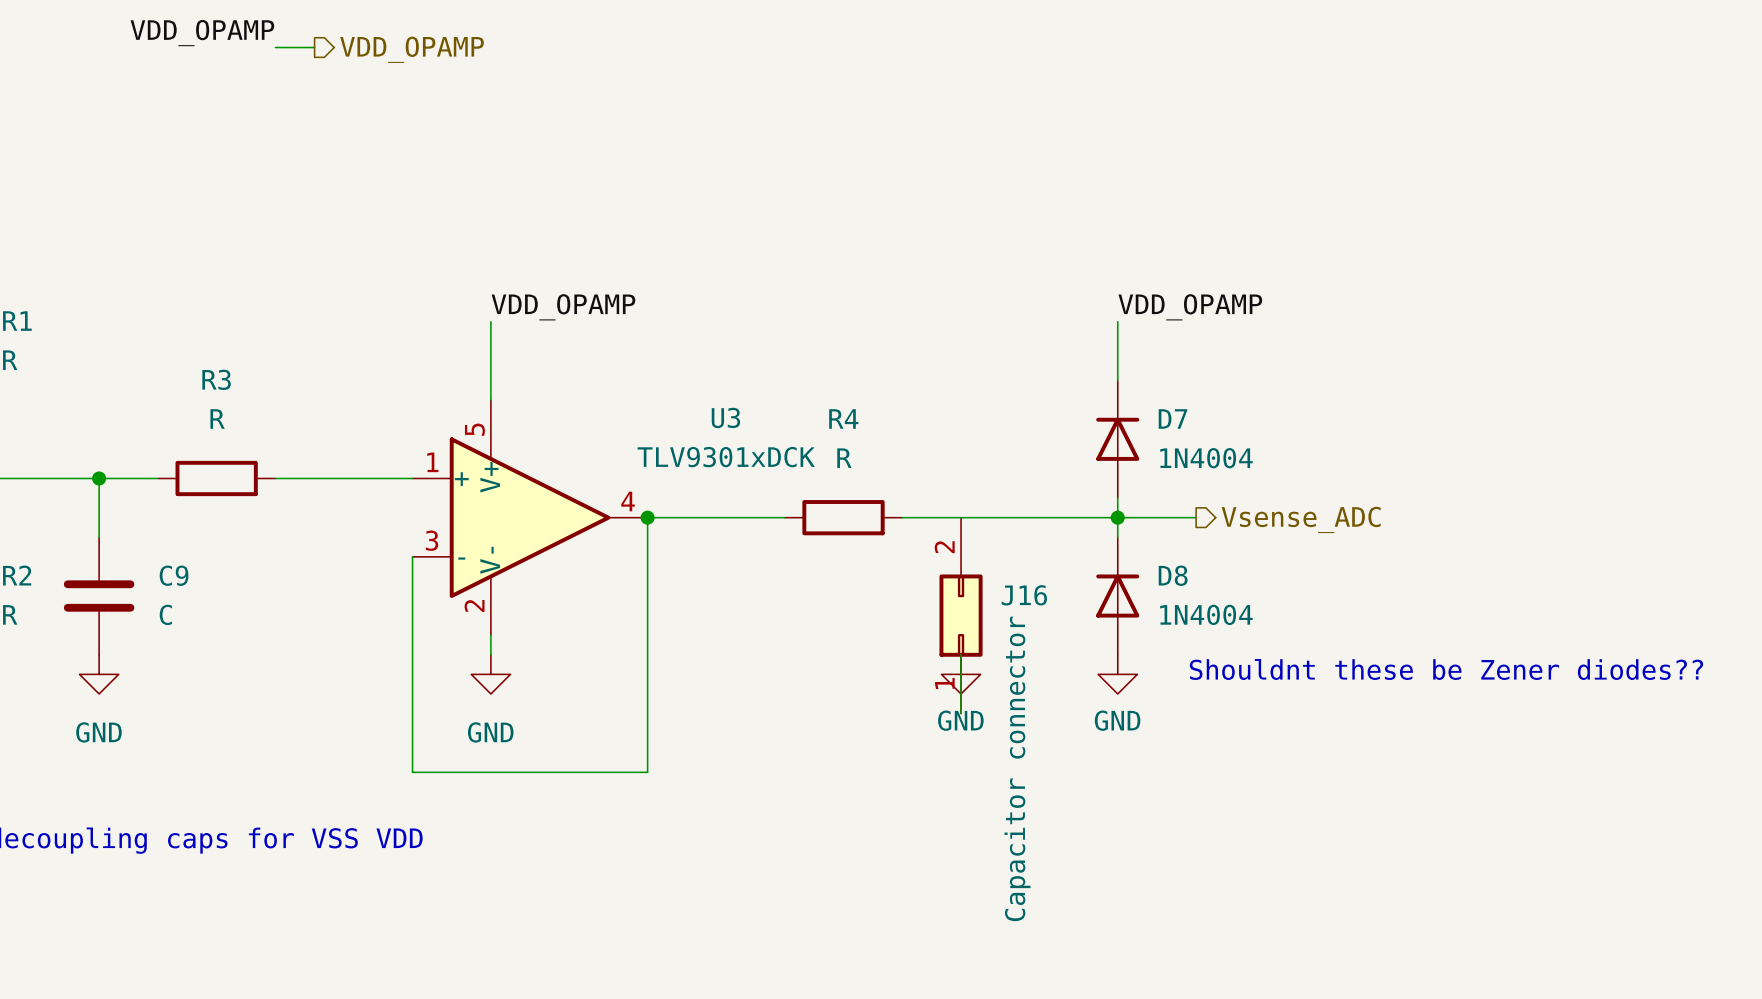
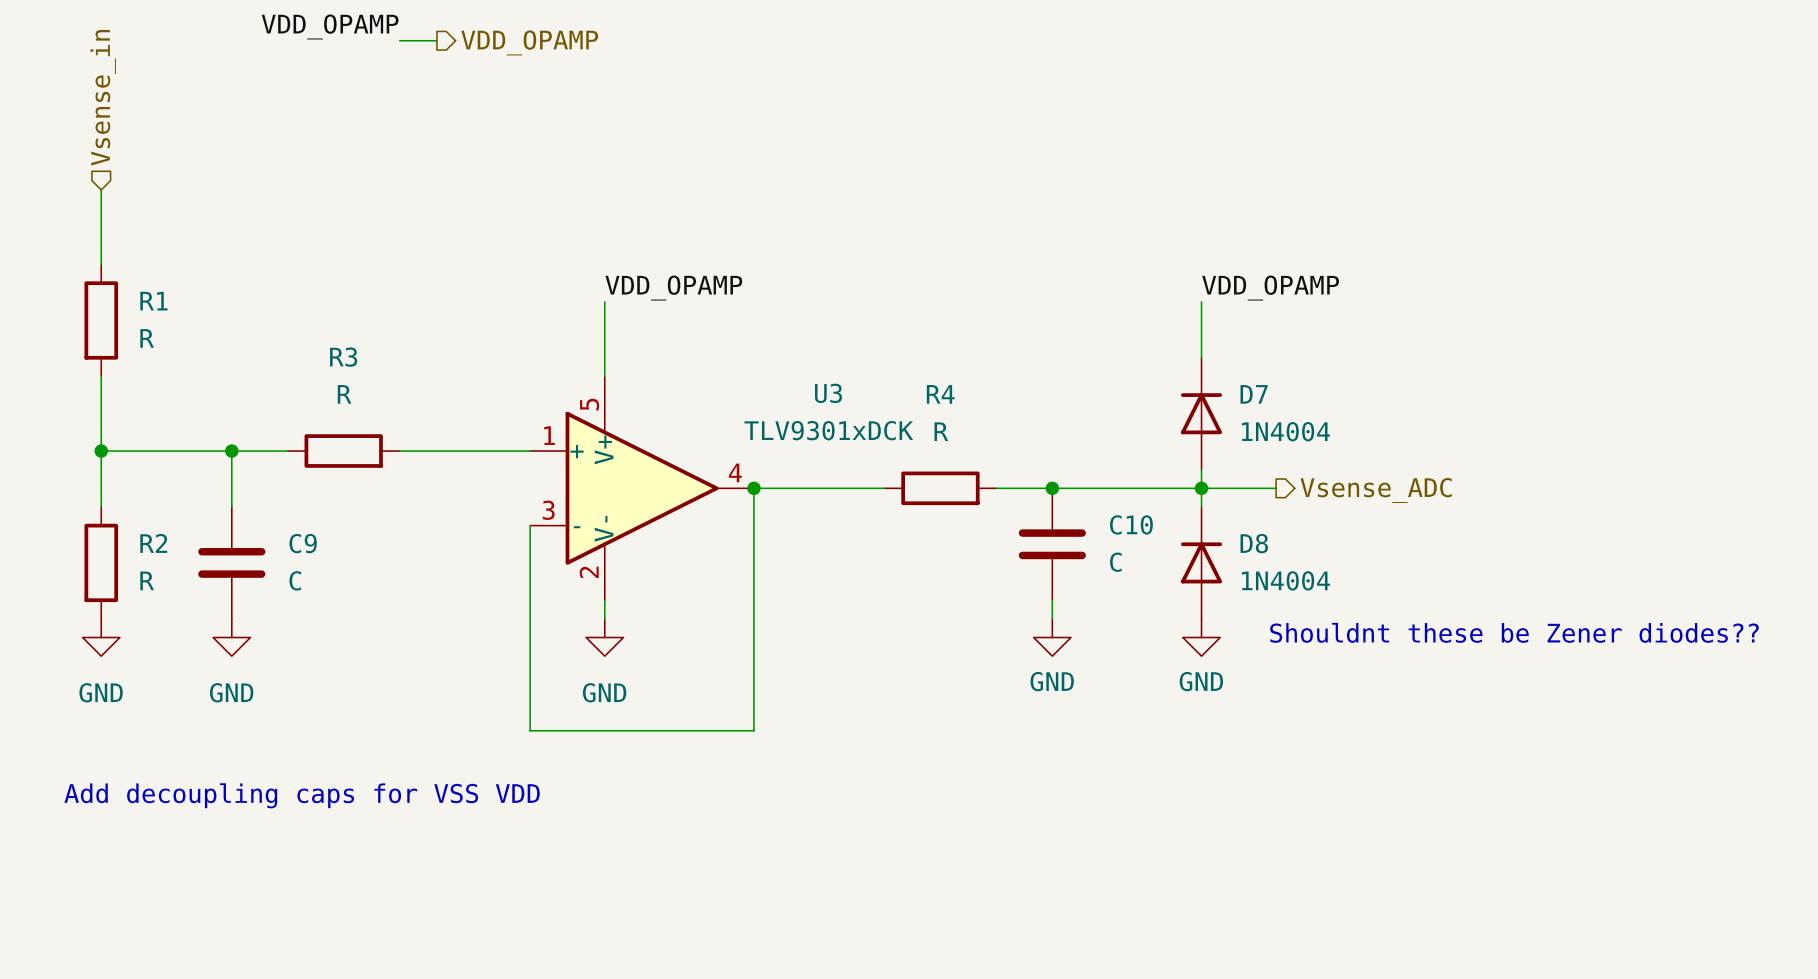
junction: none -> (1052, 488)
C10: none -> C (1052, 544)
J16: Capacitor connector (961, 615) -> none

